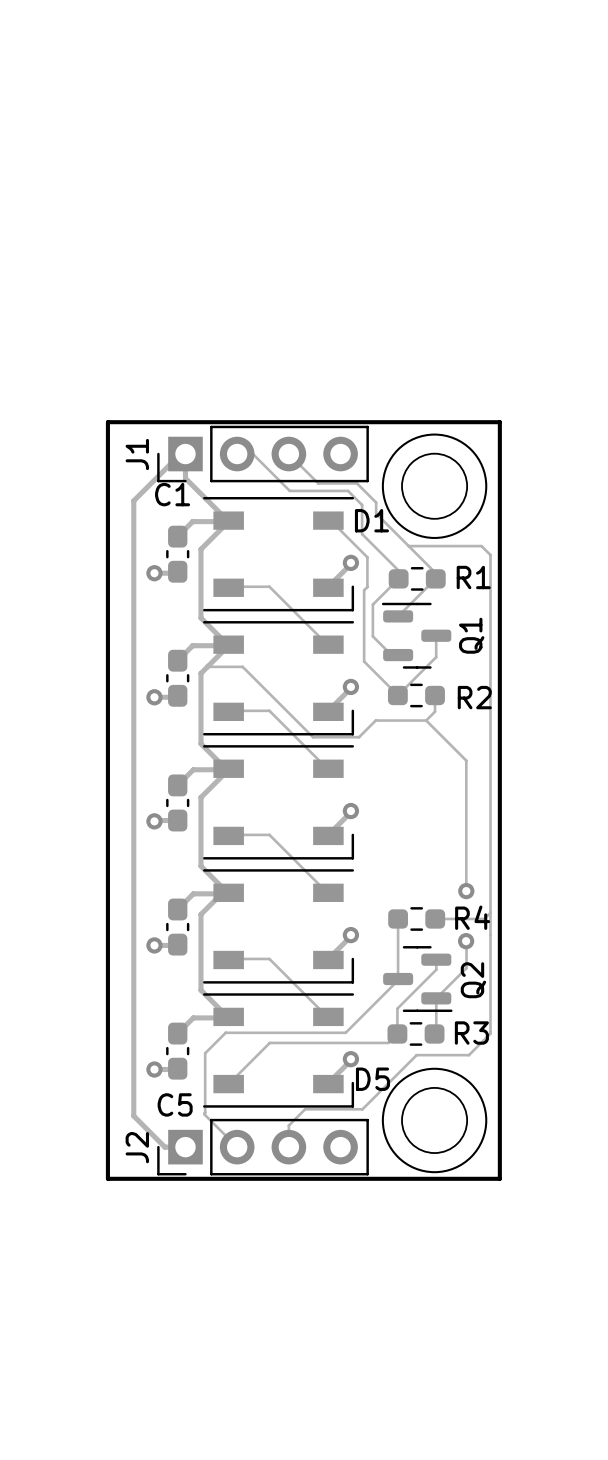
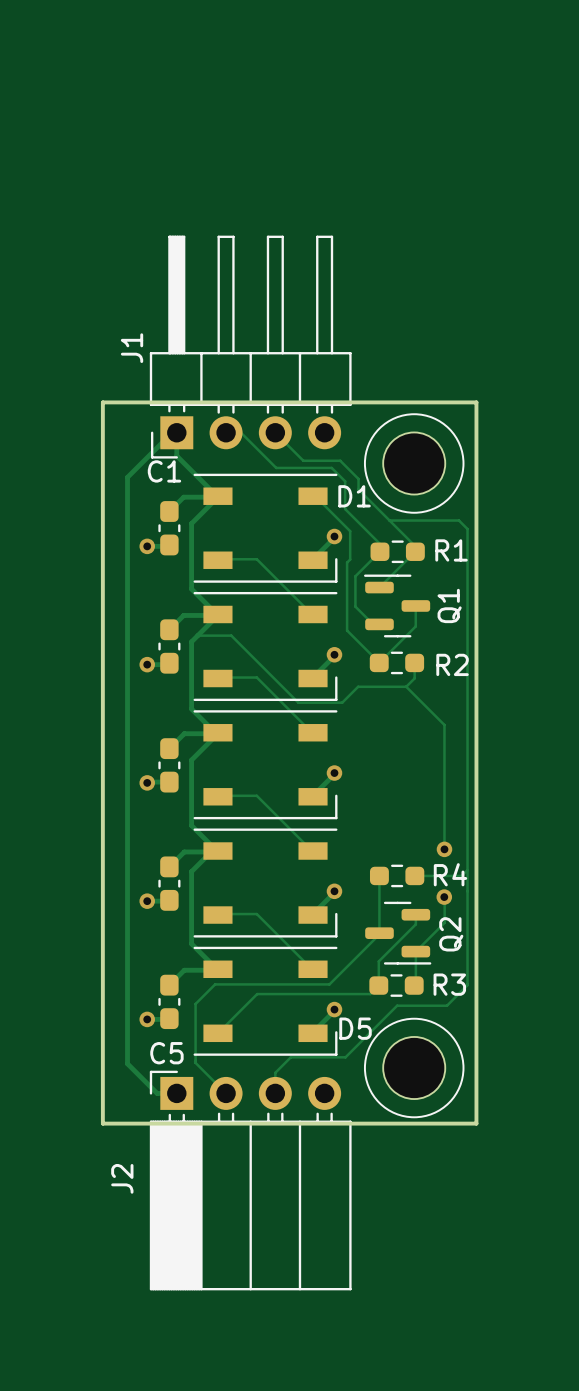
J1 footprint: [157, 425, 369, 483] -> [149, 235, 352, 459]
J2 footprint: [157, 1118, 369, 1176] -> [149, 1070, 352, 1291]

